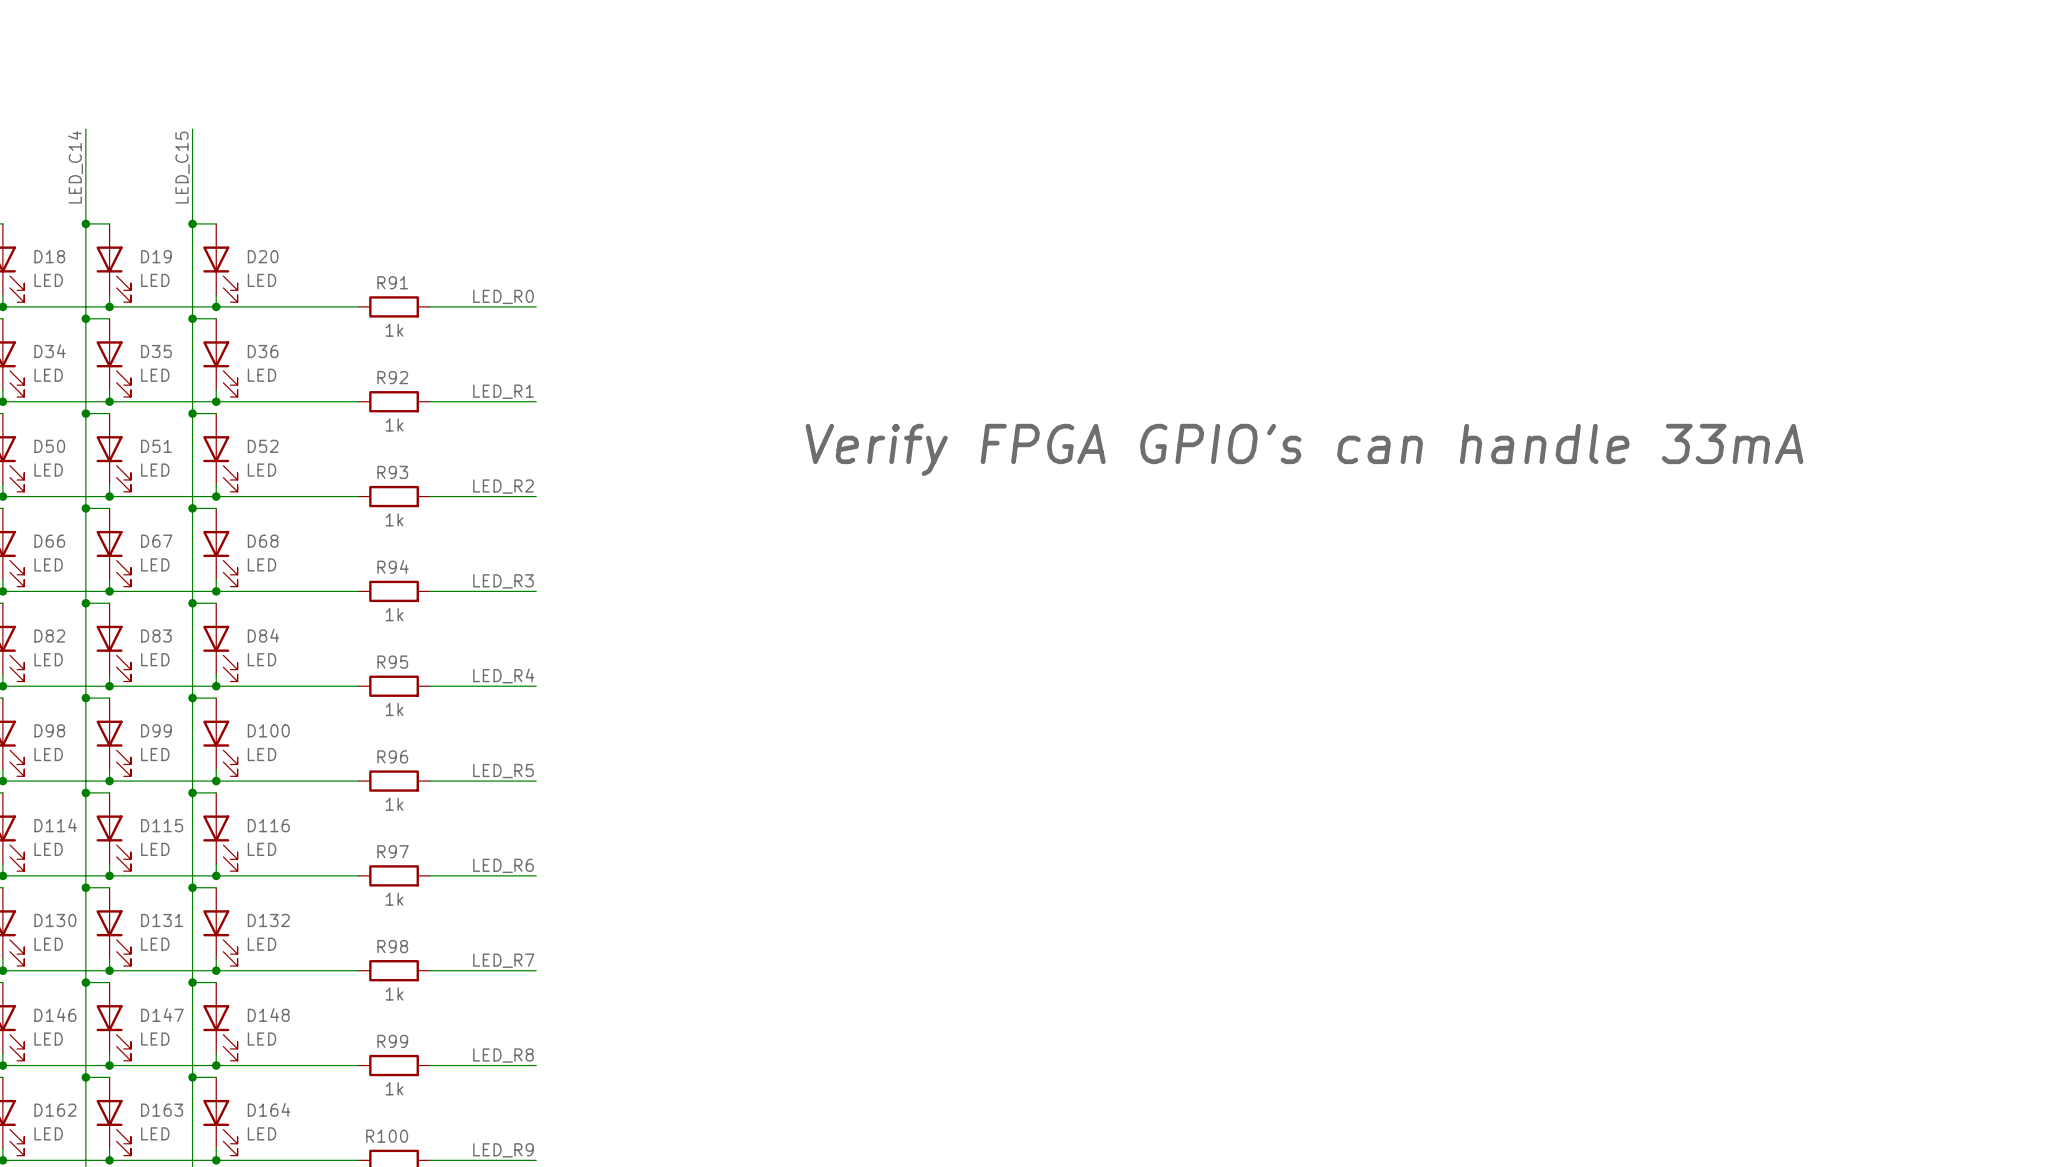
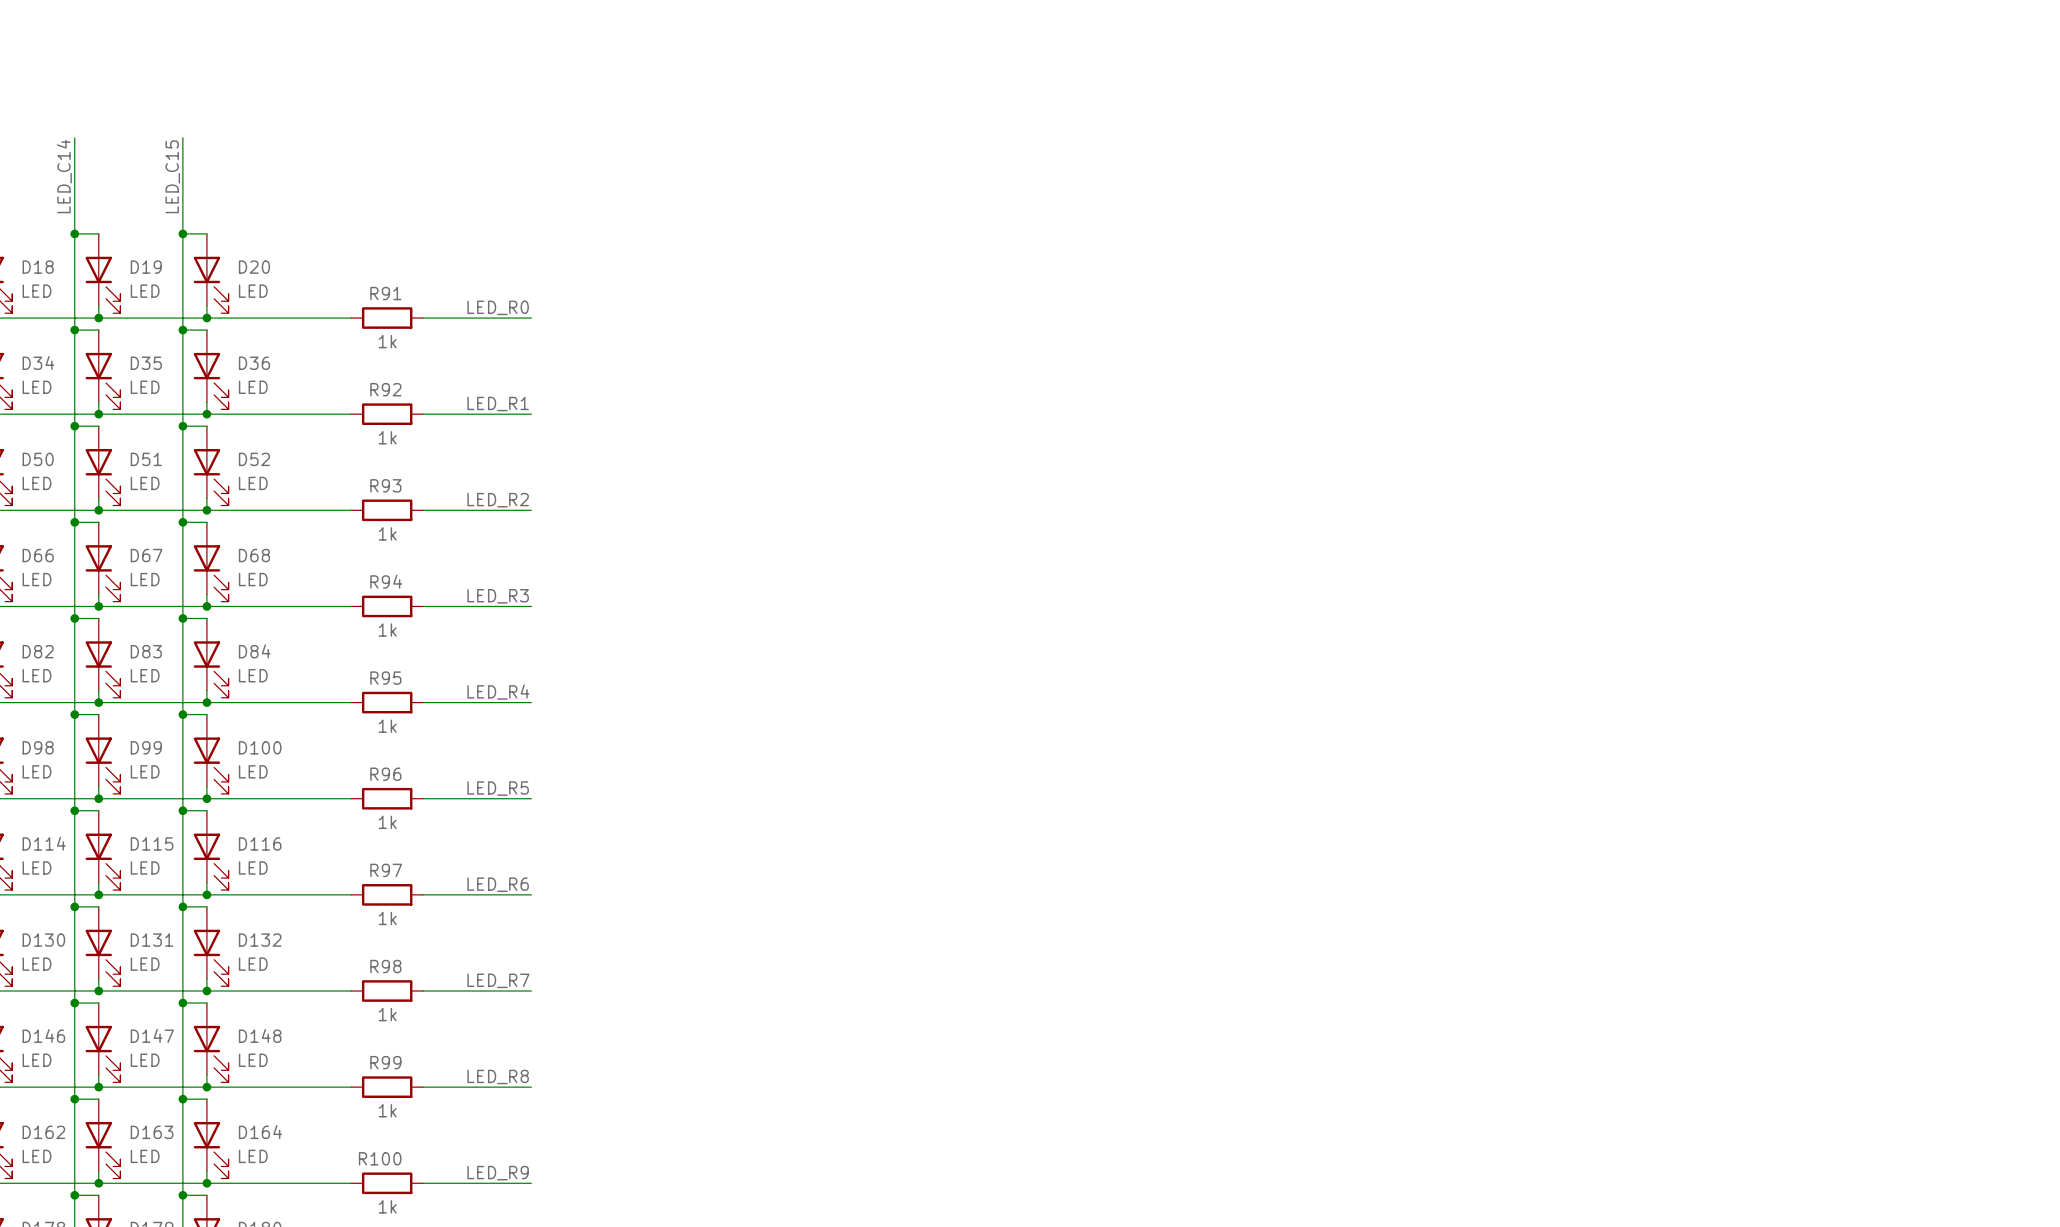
label: Verify FPGA GPIO's can handle 33mA (1304, 449) -> none

